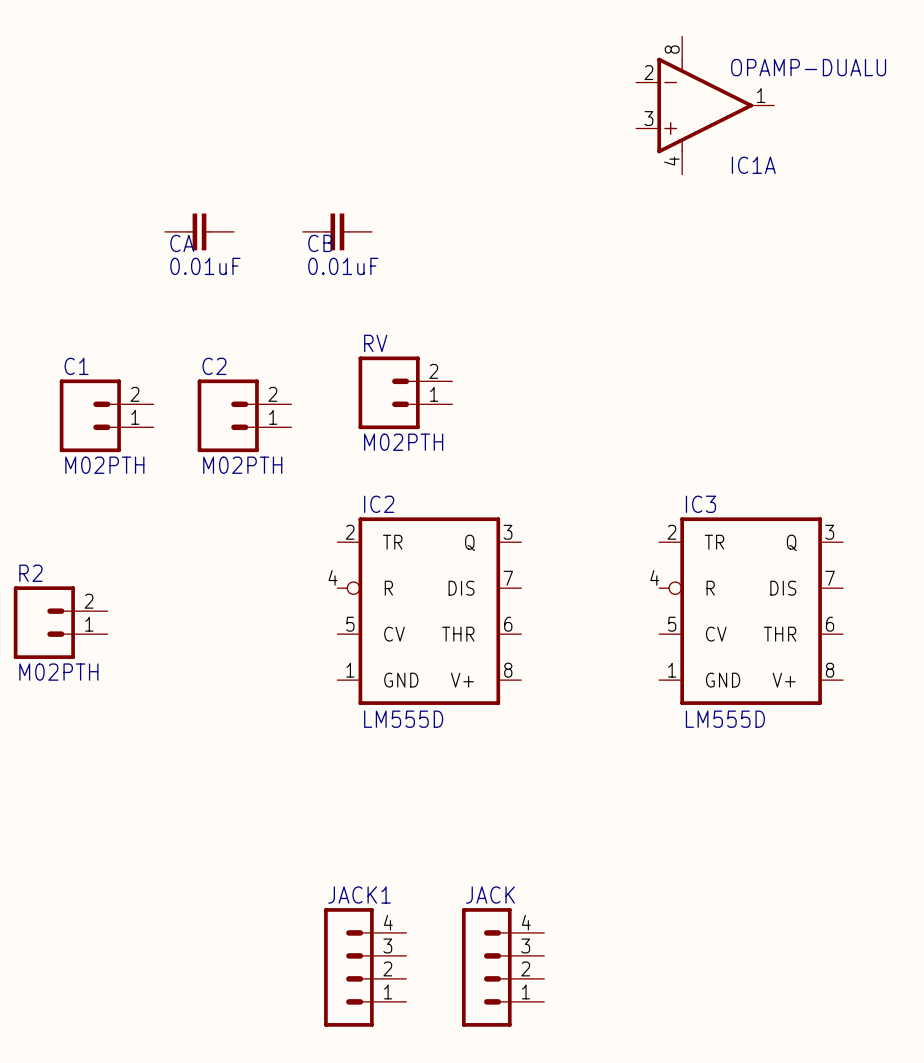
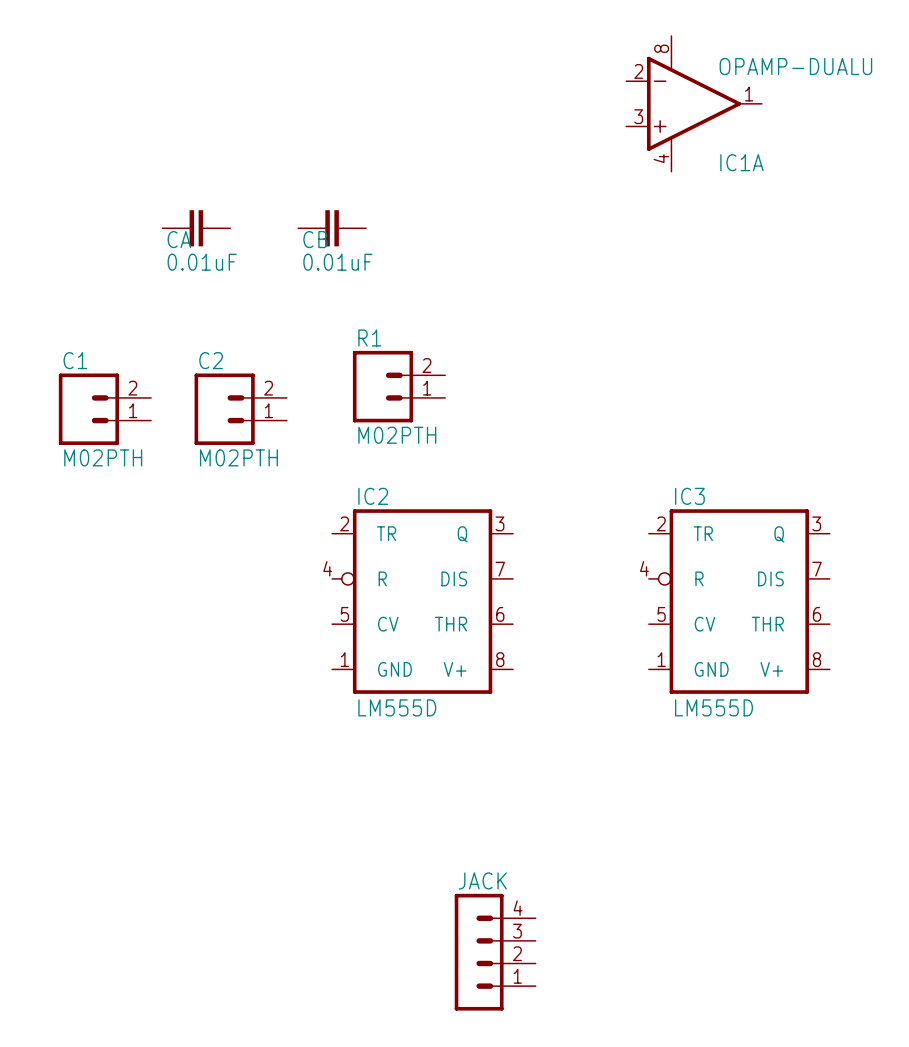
RV name: RV (375, 343) -> R1 (369, 338)
R2: M02PTH (60, 622) -> none
JACK1: (365, 967) -> none

